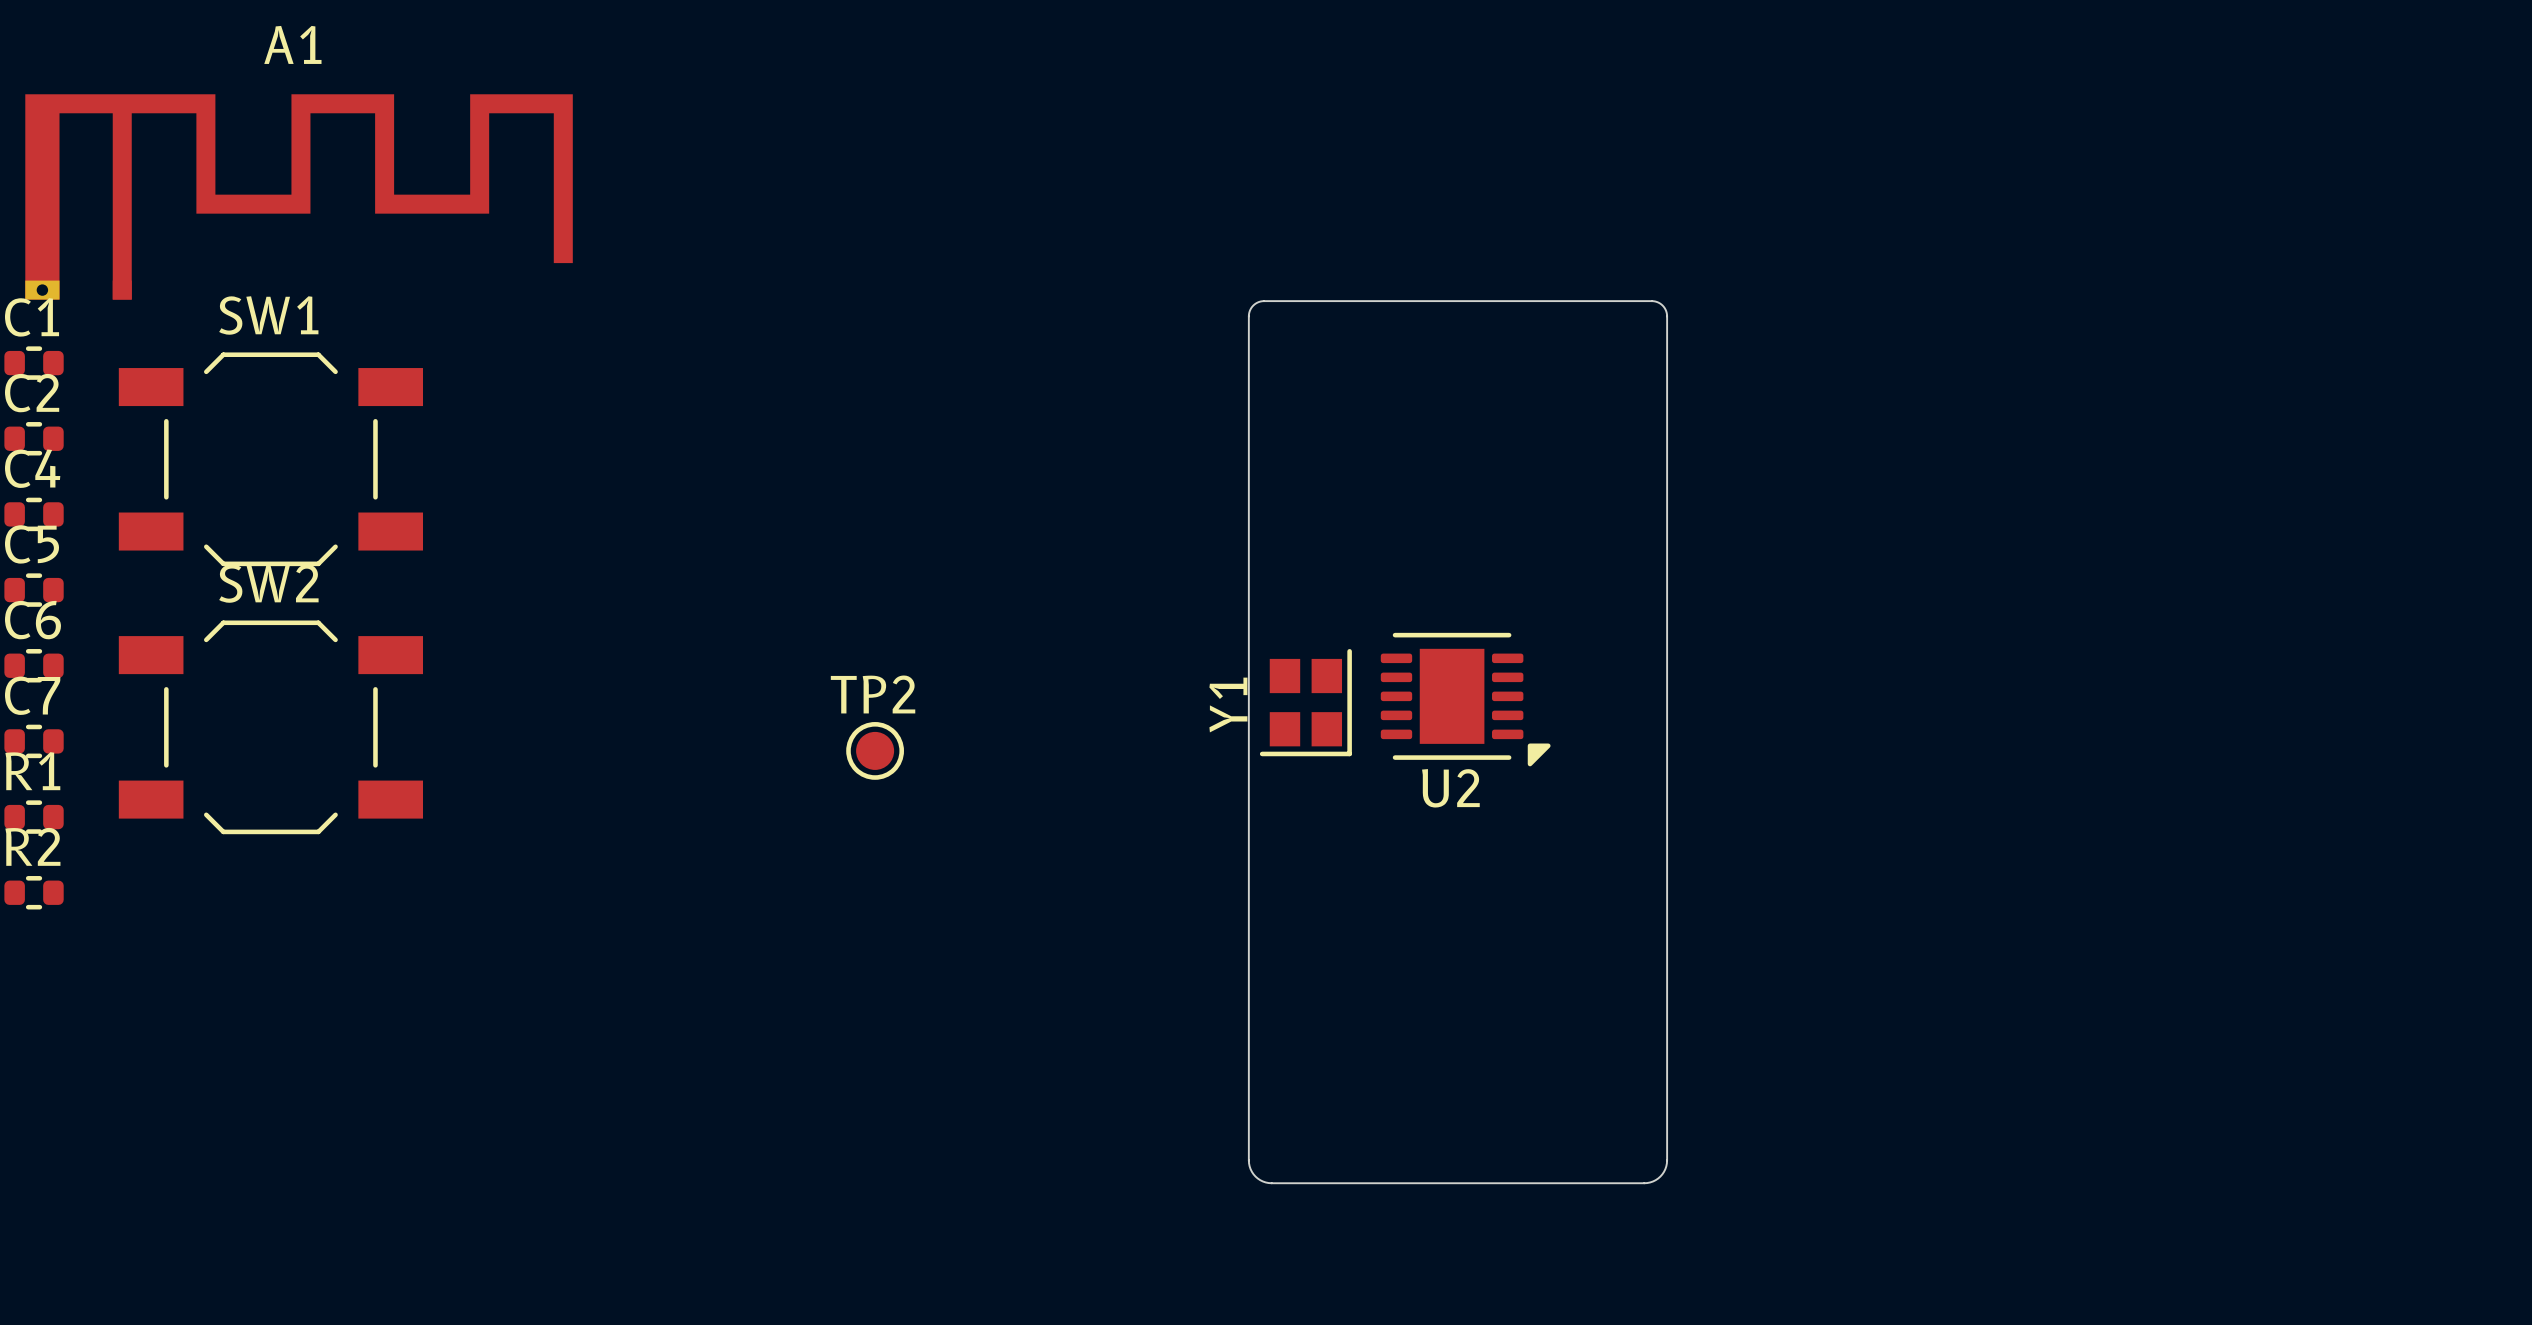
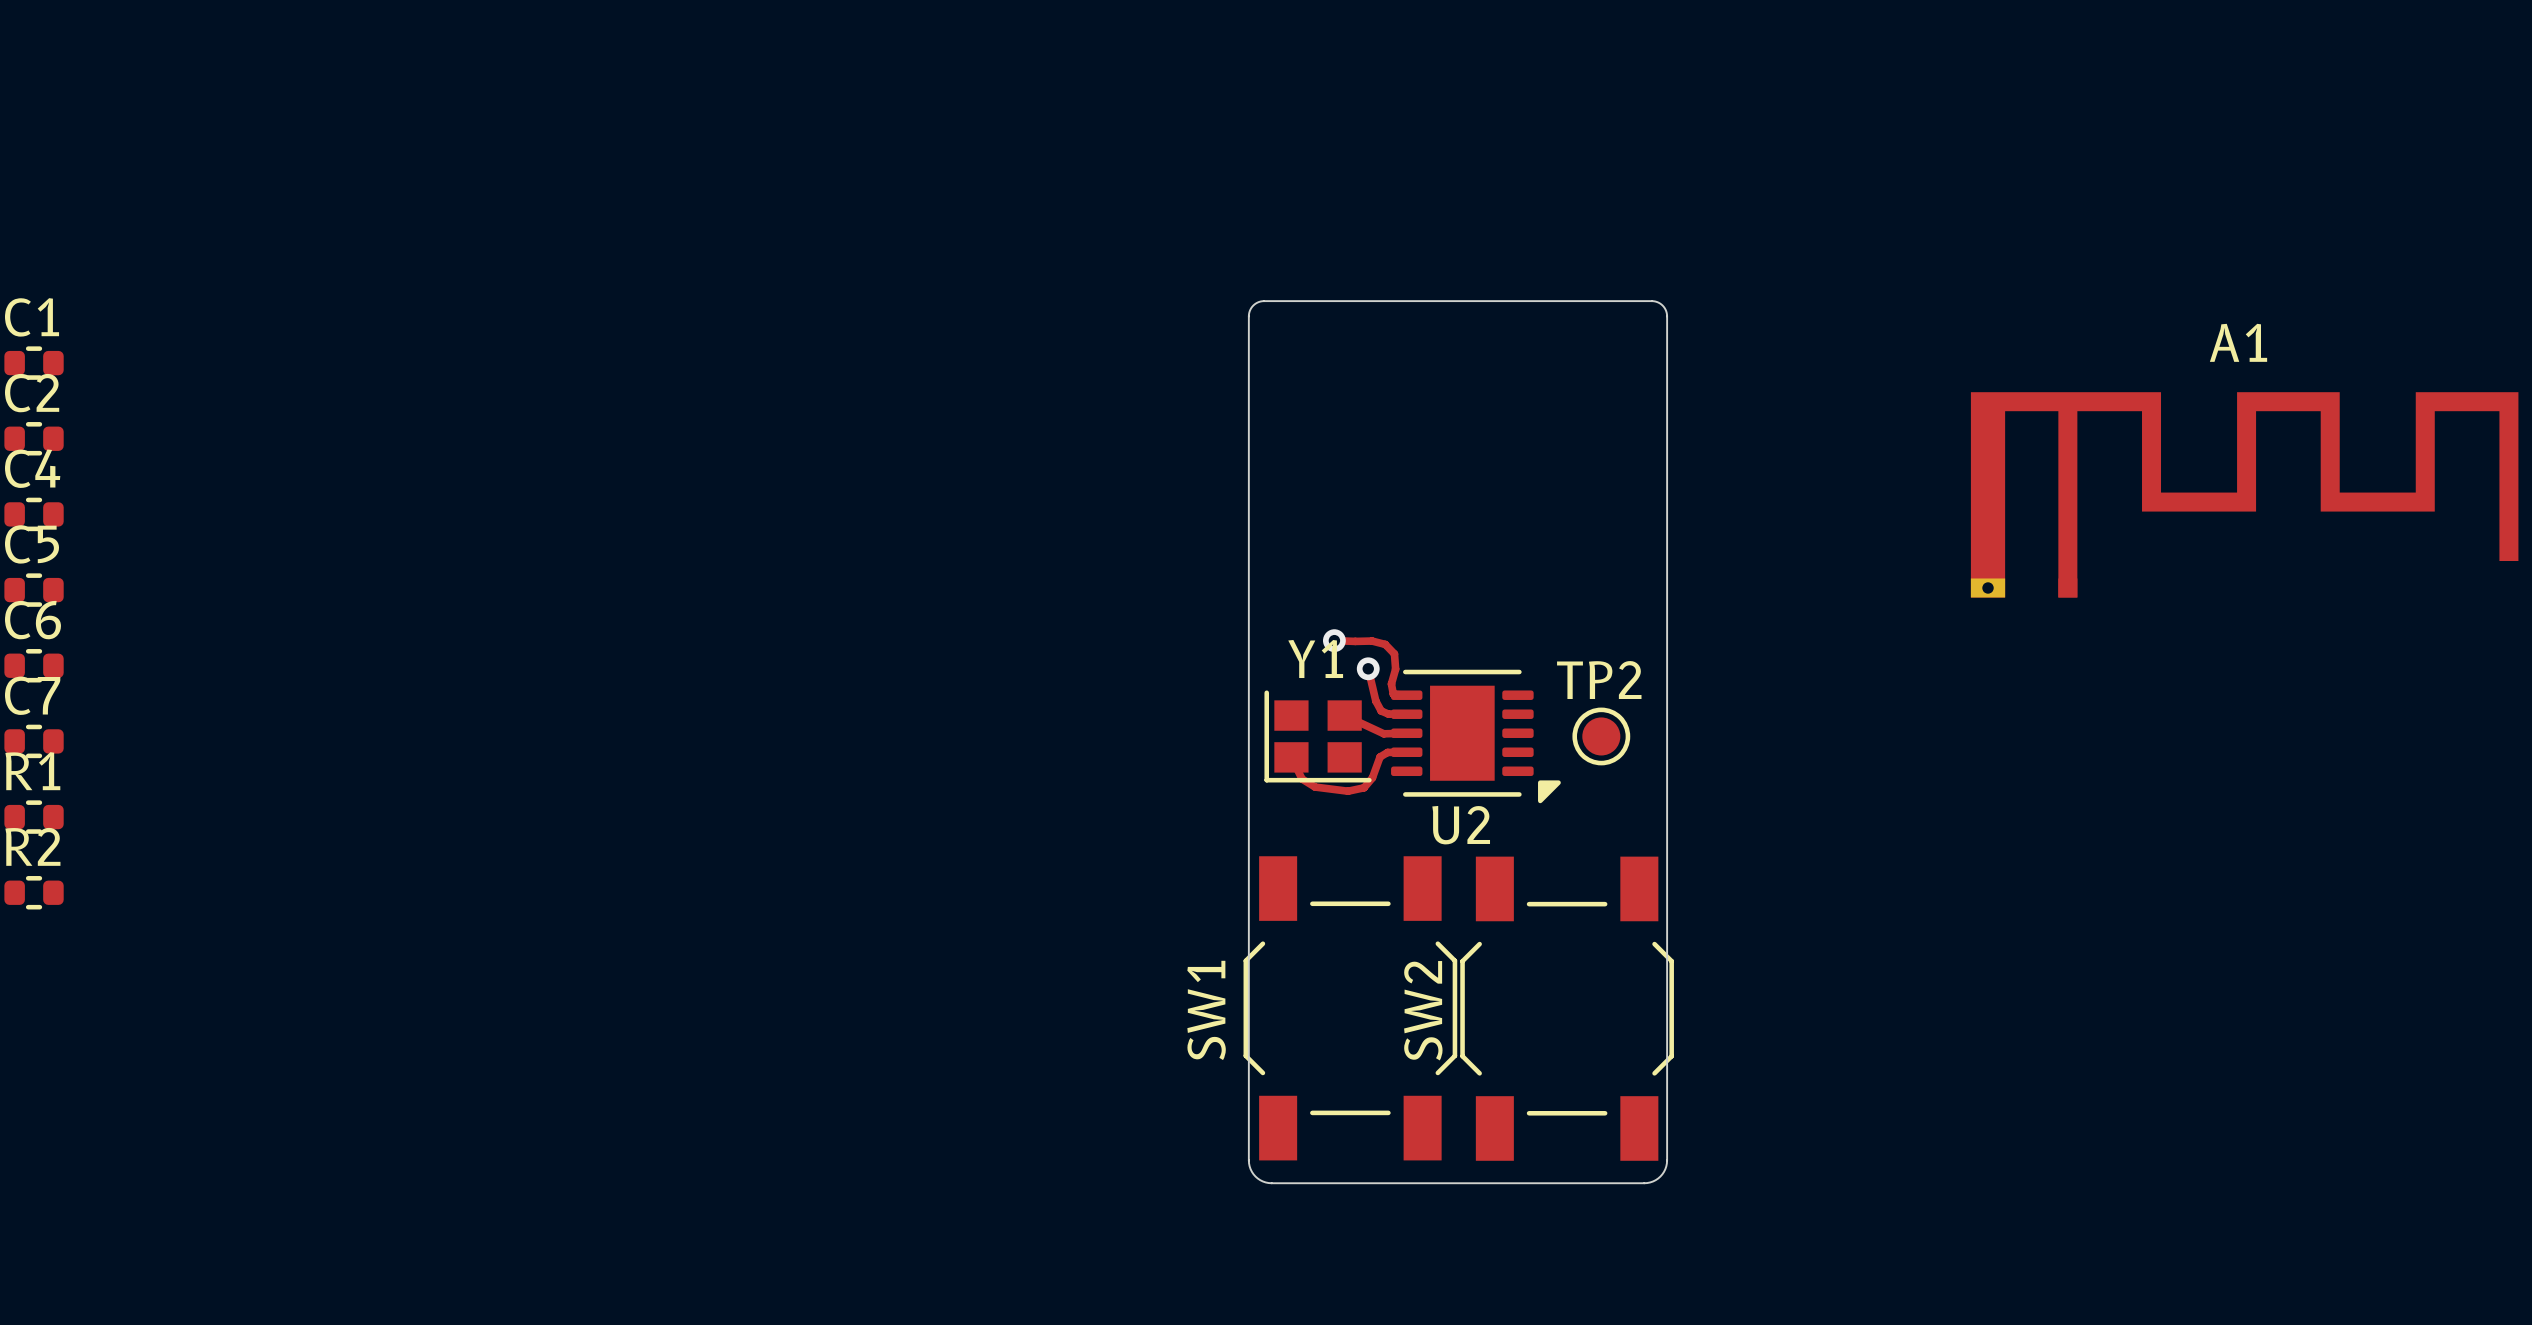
A1 position: (299, 196) -> (2244, 494)
SW1 name position: SW1 (268, 315) -> SW1 (1206, 1010)
SW1 rotation: 0° (270, 459) -> 90° clockwise (1350, 1008)
SW1 position: (270, 459) -> (1350, 1008)
SW2 name position: SW2 (268, 583) -> SW2 (1423, 1010)
track: none -> (1334, 640) (1372, 641) (1385, 644) (1394, 653) (1395, 669) (1391, 684) (1393, 694) (1406, 695)
via: none -> (1334, 640)
track: none -> (1368, 668) (1375, 701) (1381, 710) (1388, 714) (1406, 714)
via: none -> (1368, 668)
U2 position: (1465, 699) -> (1475, 736)
Y1 rotation: 0° (1305, 702) -> 90° clockwise (1318, 736)
track: none -> (1344, 715) (1383, 733) (1406, 733)
SW2 rotation: 0° (270, 727) -> 90° clockwise (1567, 1008)
SW2 position: (270, 727) -> (1567, 1008)
TP2 position: (875, 750) -> (1601, 736)
track: none -> (1406, 752) (1387, 752) (1380, 757) (1372, 777) (1364, 787) (1348, 791) (1315, 787) (1302, 779) (1291, 757)

